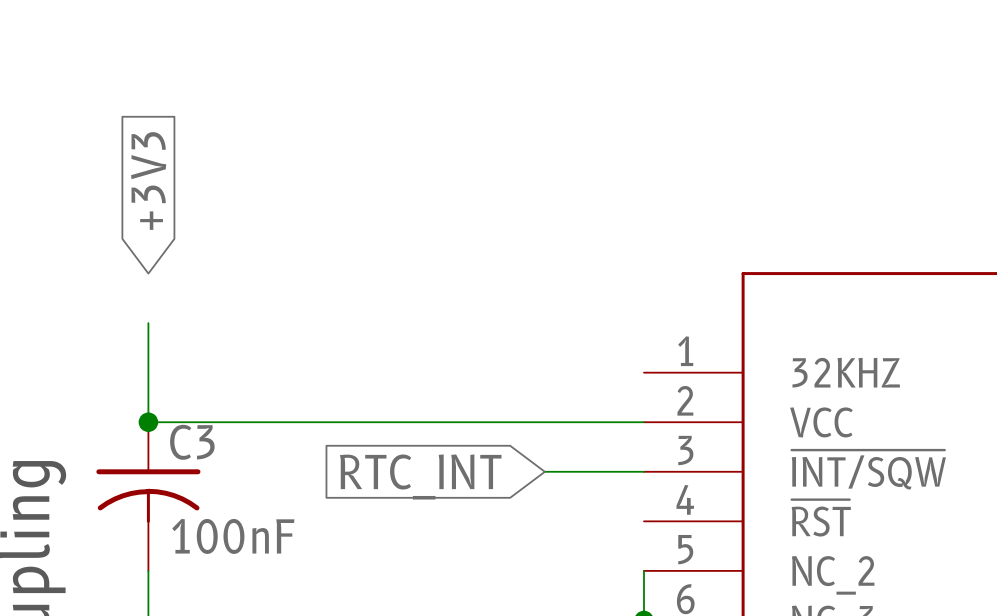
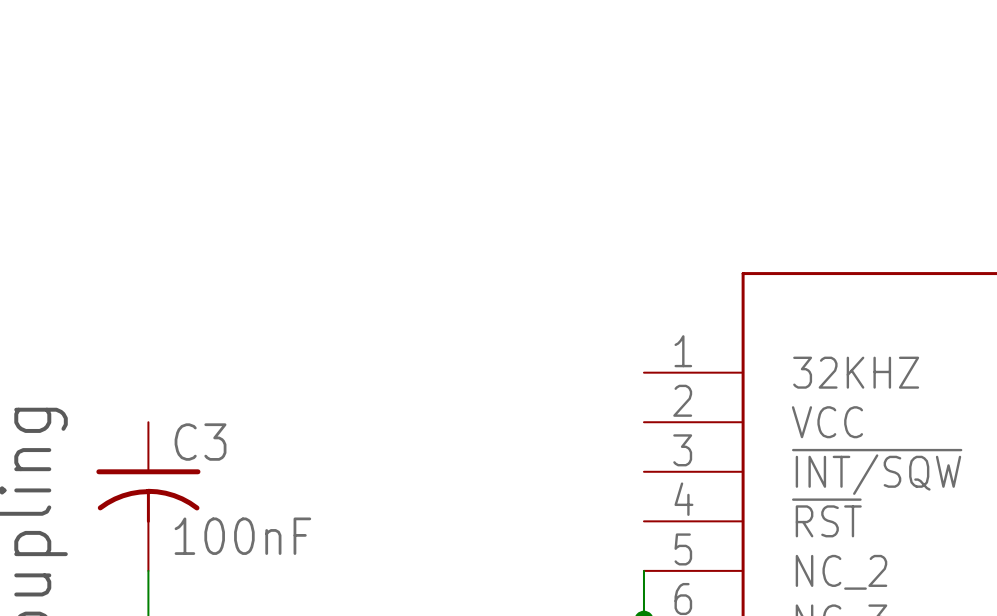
global label: +3V3 (148, 181) -> none
wire: (148, 323) (148, 422) (643, 422) -> none
junction: (148, 422) -> none
wire: (544, 471) (643, 471) -> none
global label: RTC_INT (420, 476) -> none

